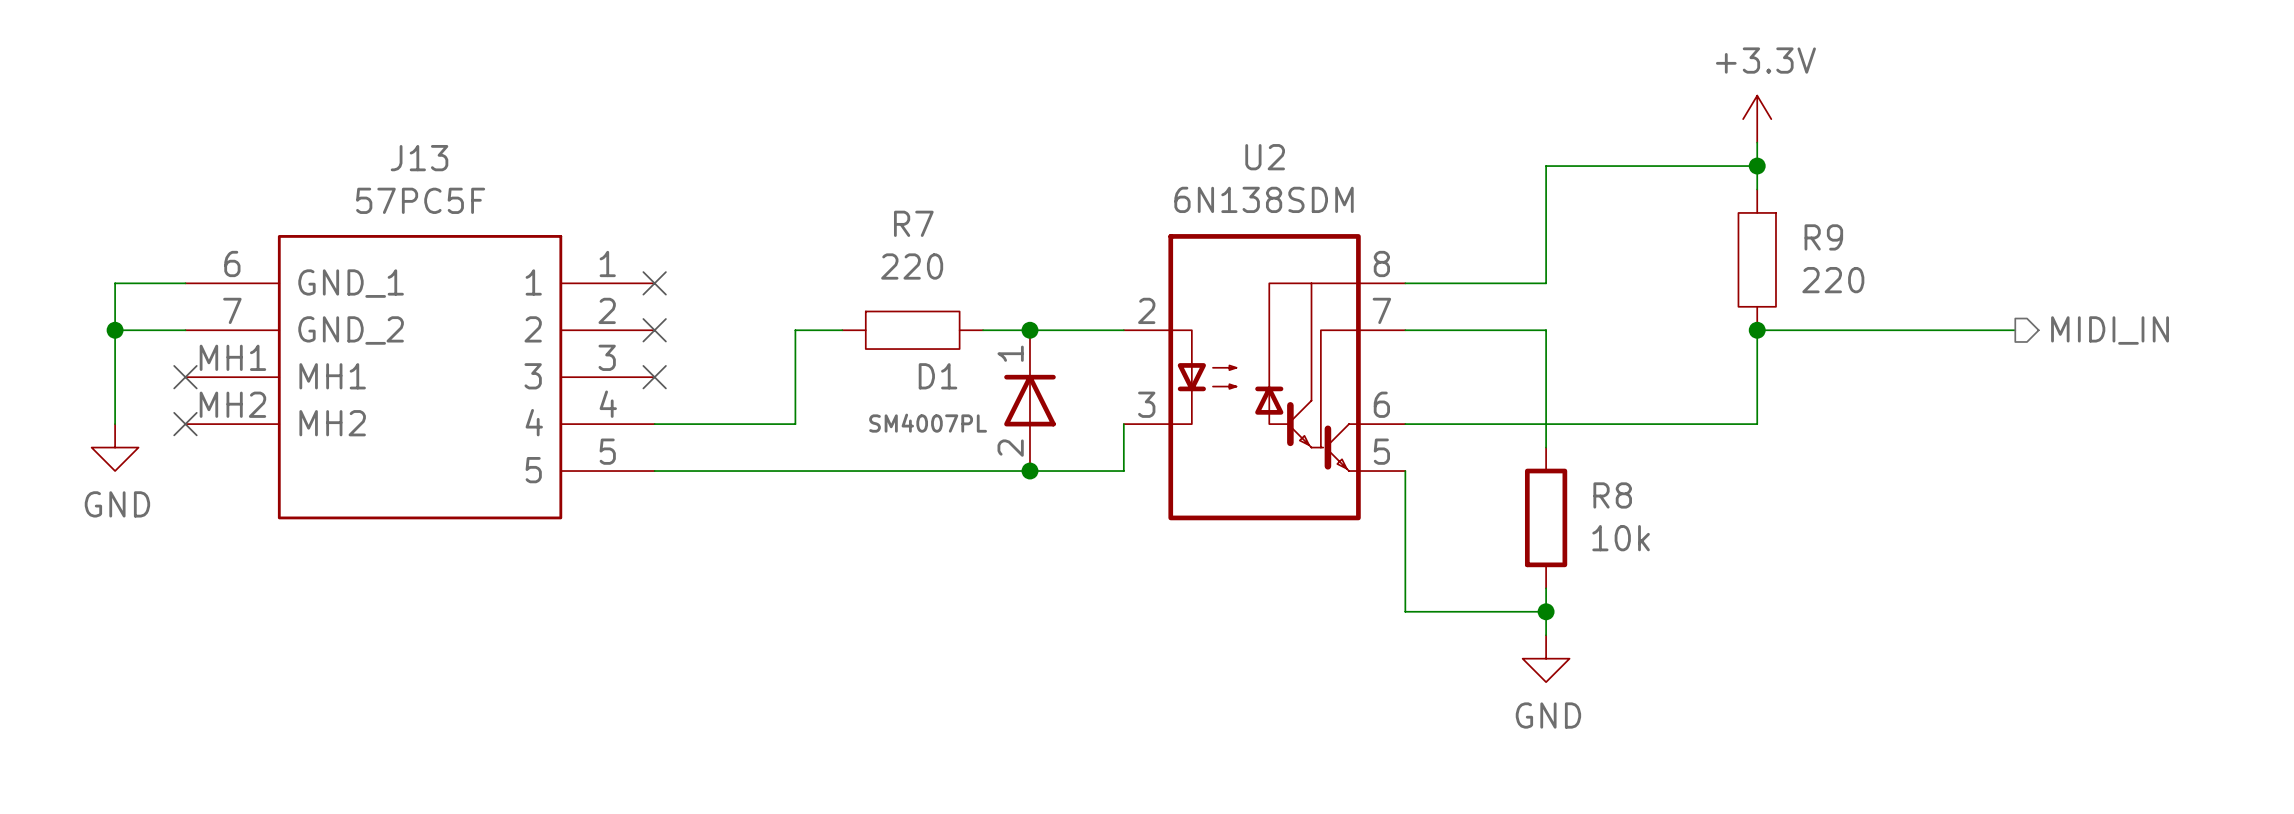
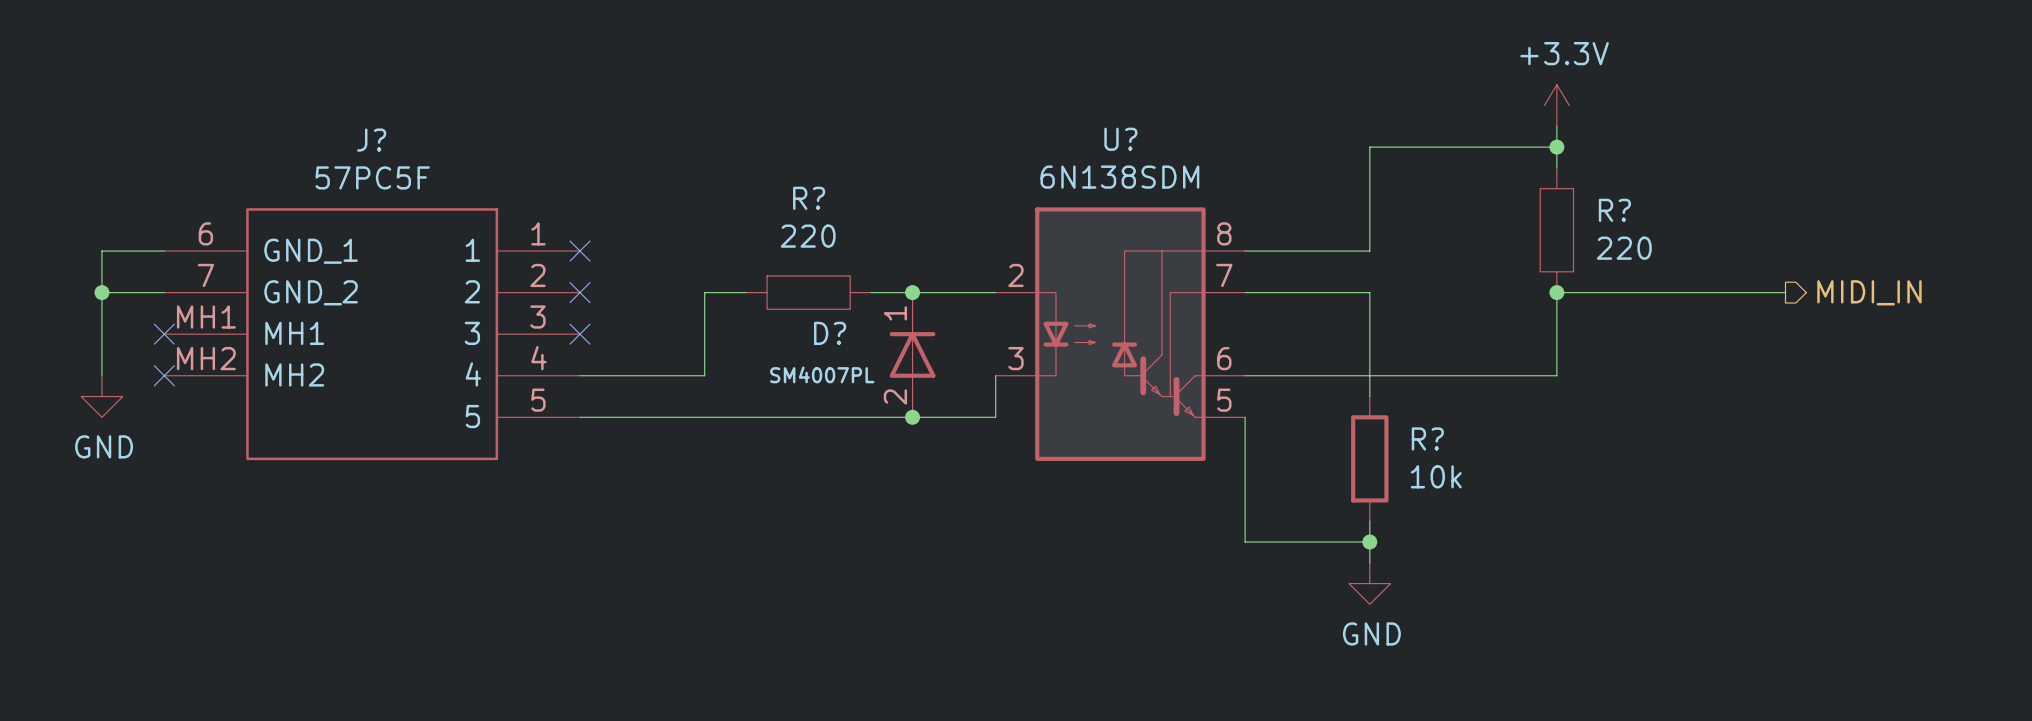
U2 name: U2 (1265, 157) -> U? (1120, 139)
J13 name: J13 (419, 158) -> J? (371, 140)
R7 name: R7 (913, 223) -> R? (809, 198)
R9 name: R9 (1823, 237) -> R? (1614, 210)
D1 name: D1 (938, 376) -> D? (830, 333)
R8 name: R8 (1612, 495) -> R? (1427, 438)

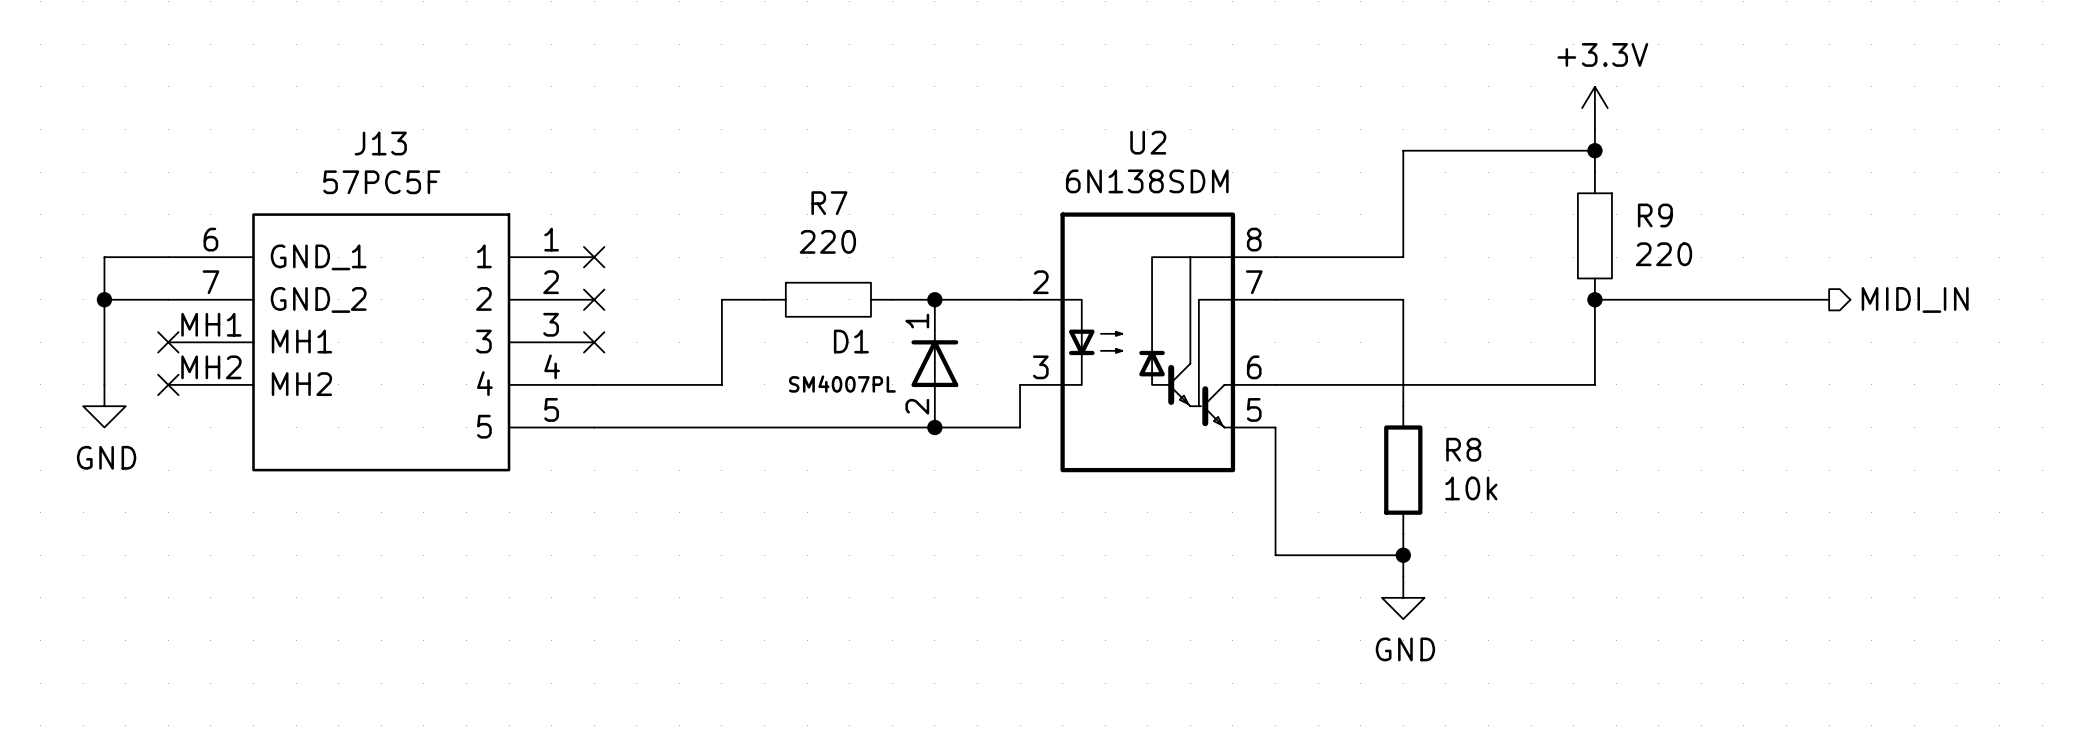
U? name: U? (1120, 139) -> U2 (1148, 142)
J? name: J? (371, 140) -> J13 (380, 143)
R? name: R? (809, 198) -> R7 (829, 203)
R? name: R? (1614, 210) -> R9 (1655, 215)
D? name: D? (830, 333) -> D1 (851, 341)
R? name: R? (1427, 438) -> R8 (1463, 449)

